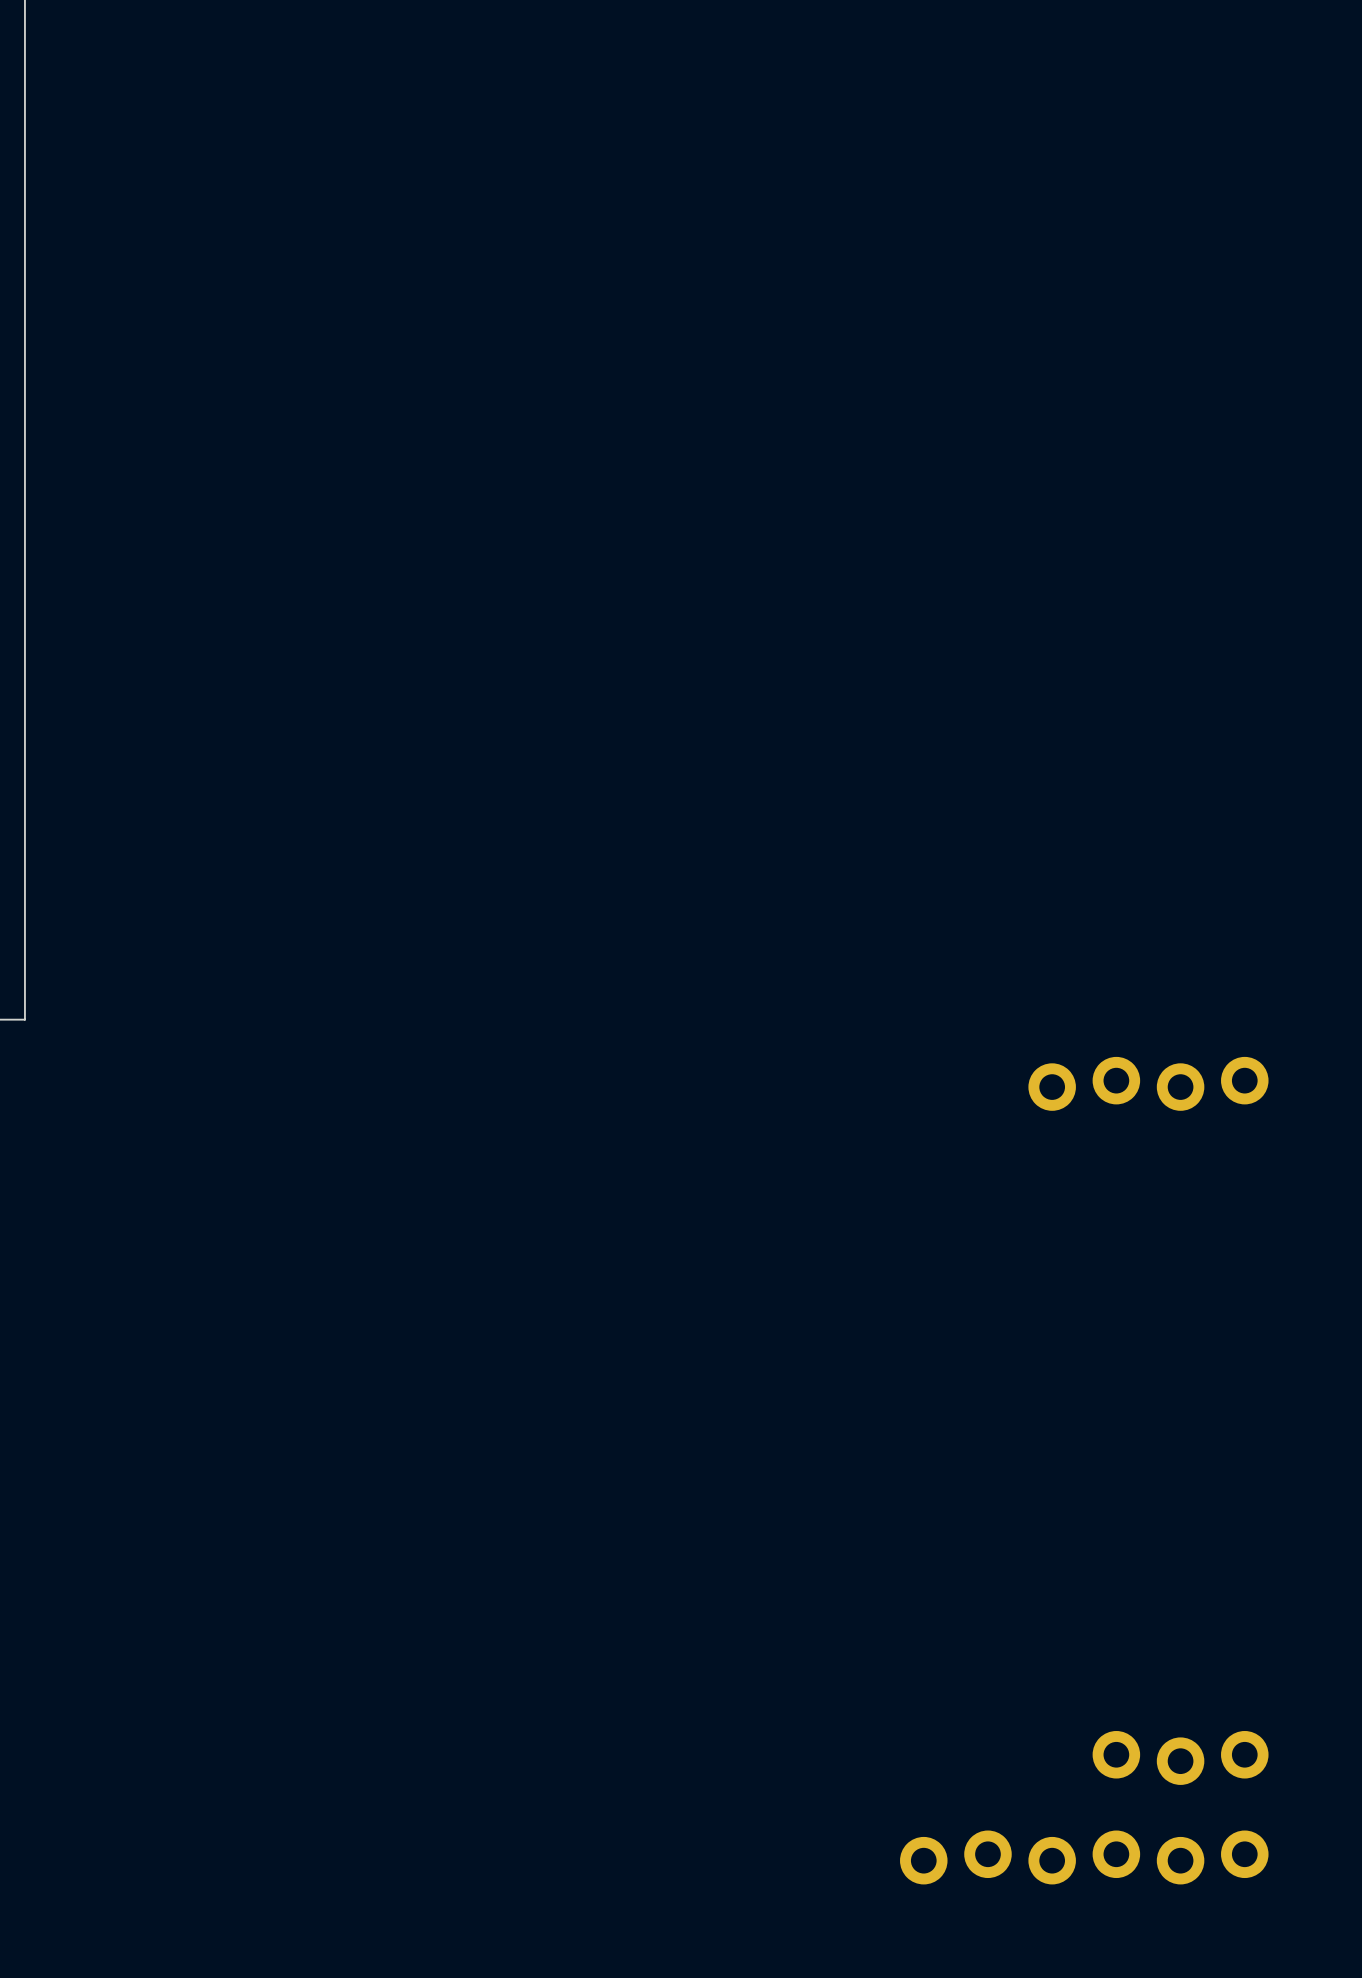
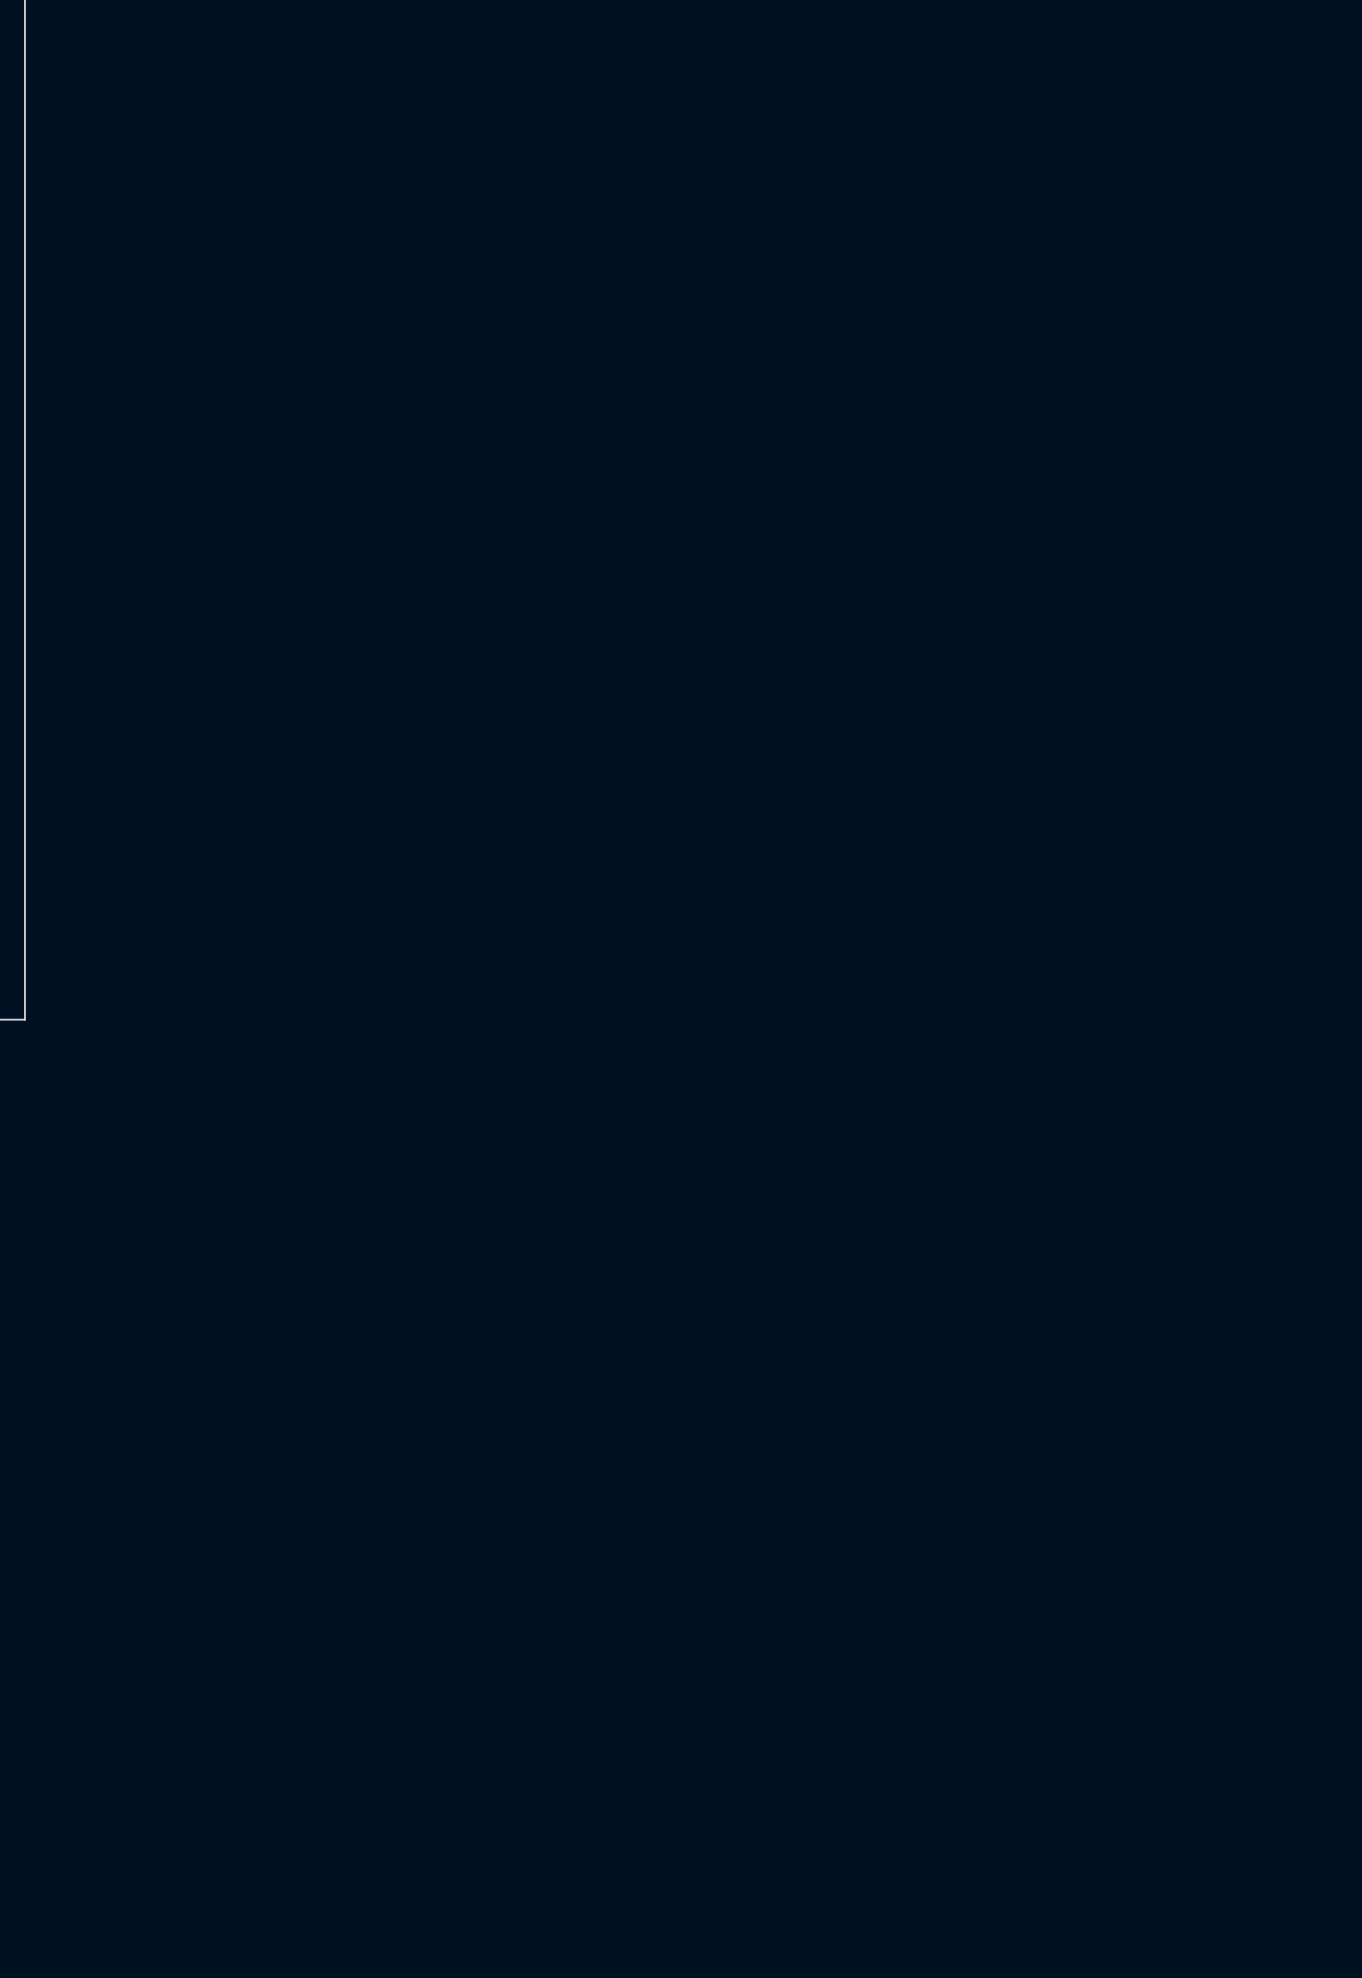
part: (1148, 1083) -> none
part: (1180, 1757) -> none
part: (1084, 1857) -> none

